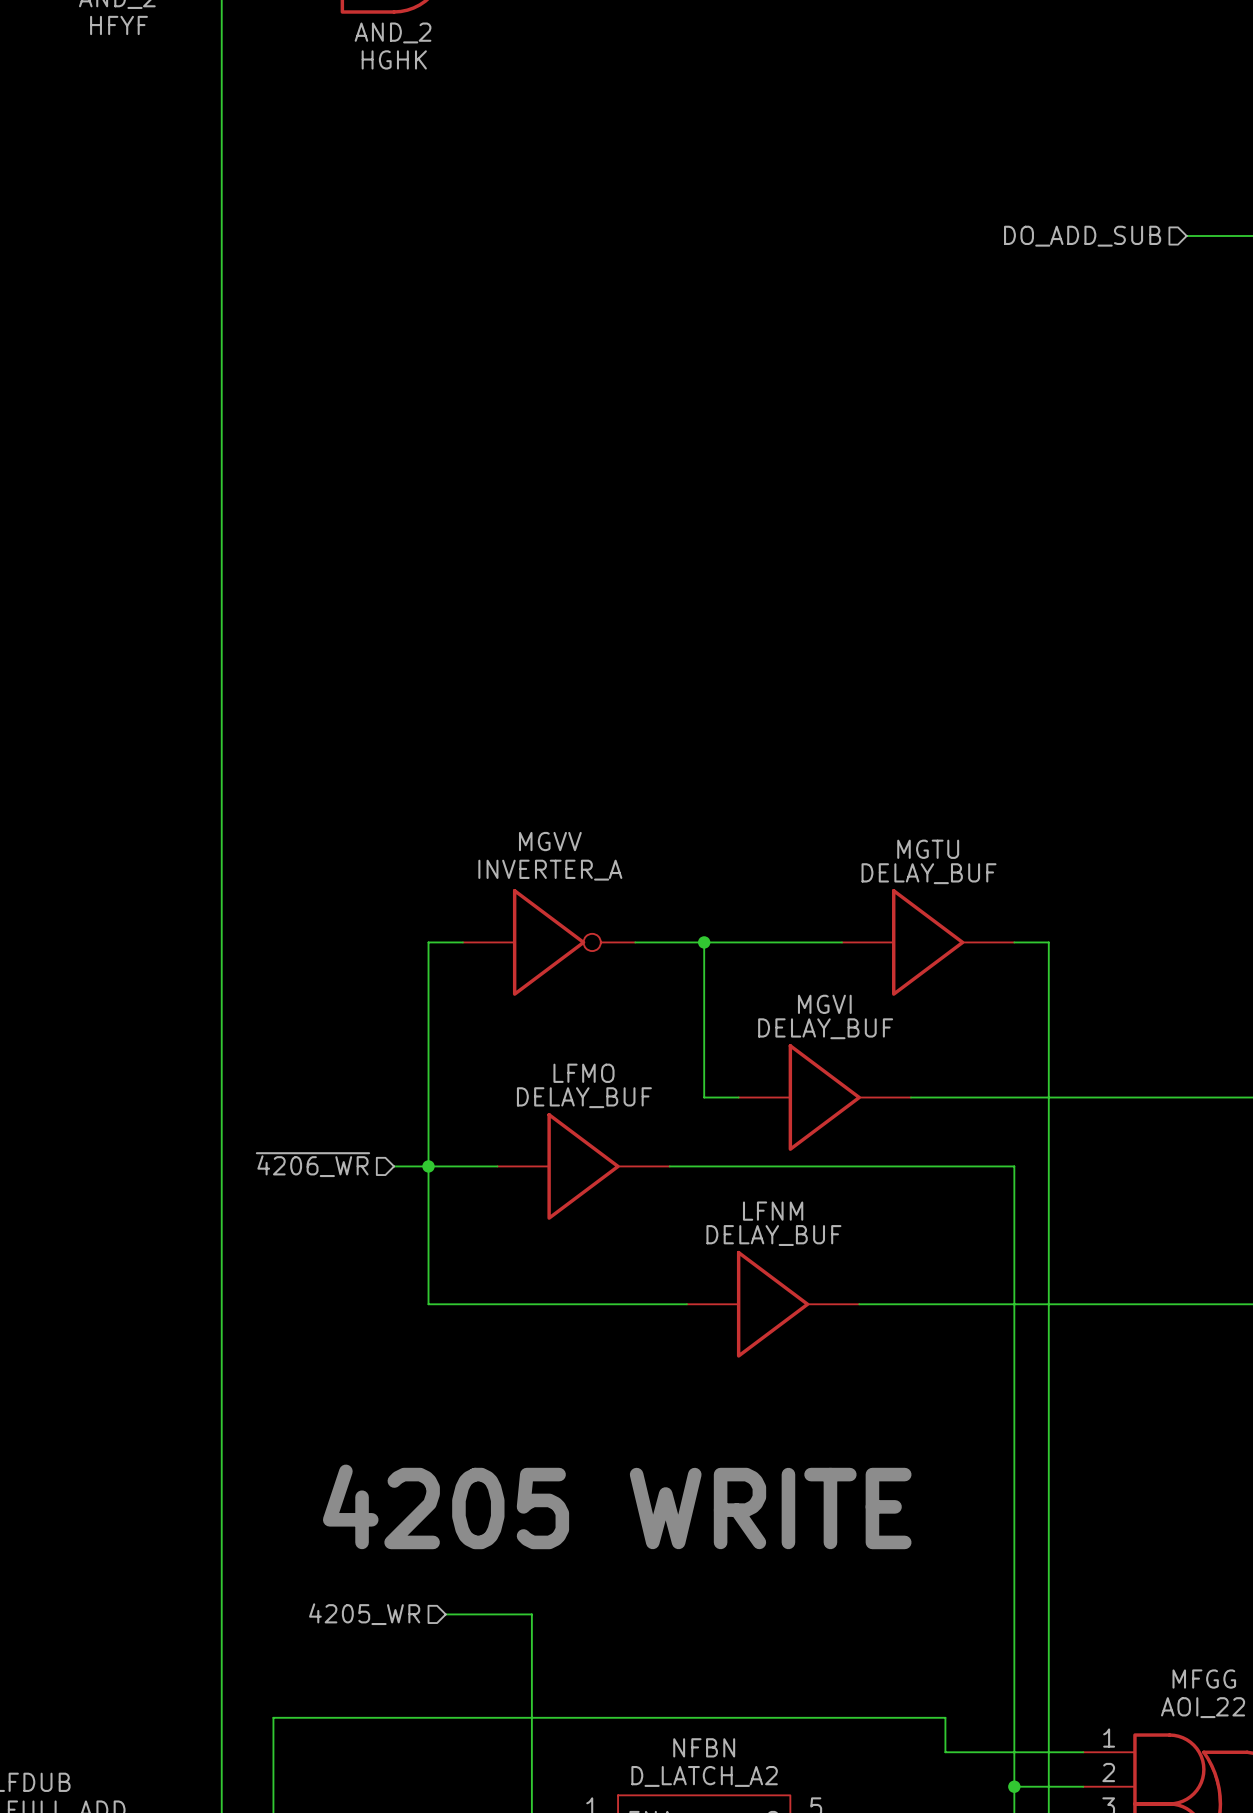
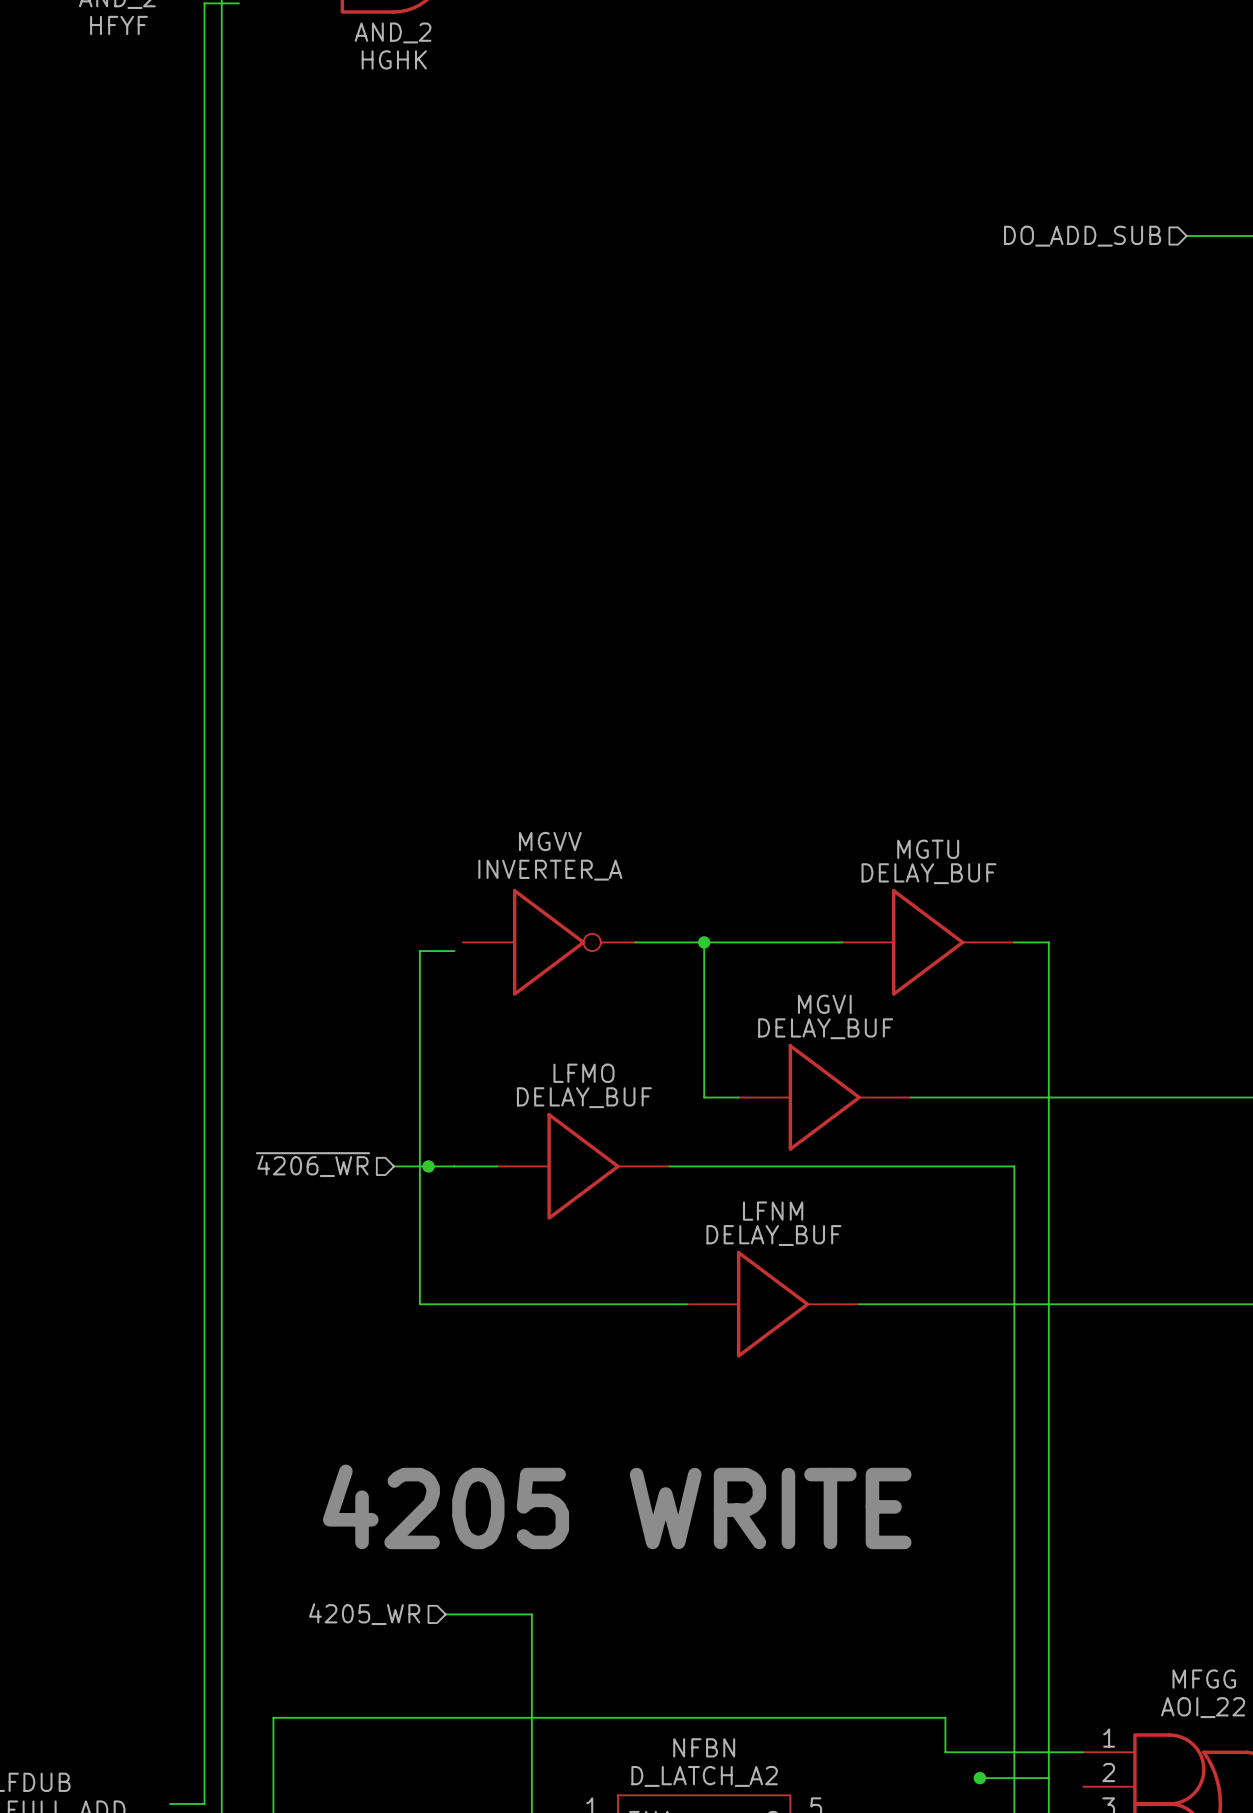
wire: none -> (238, 3) (204, 3) (204, 1803) (170, 1803)
wire: (462, 942) (428, 942) (428, 1304) -> (454, 951) (419, 951) (419, 1304) (428, 1304)
wire: (1014, 1786) (1083, 1786) -> (979, 1778) (1048, 1778)
junction position: (1014, 1786) -> (979, 1778)

